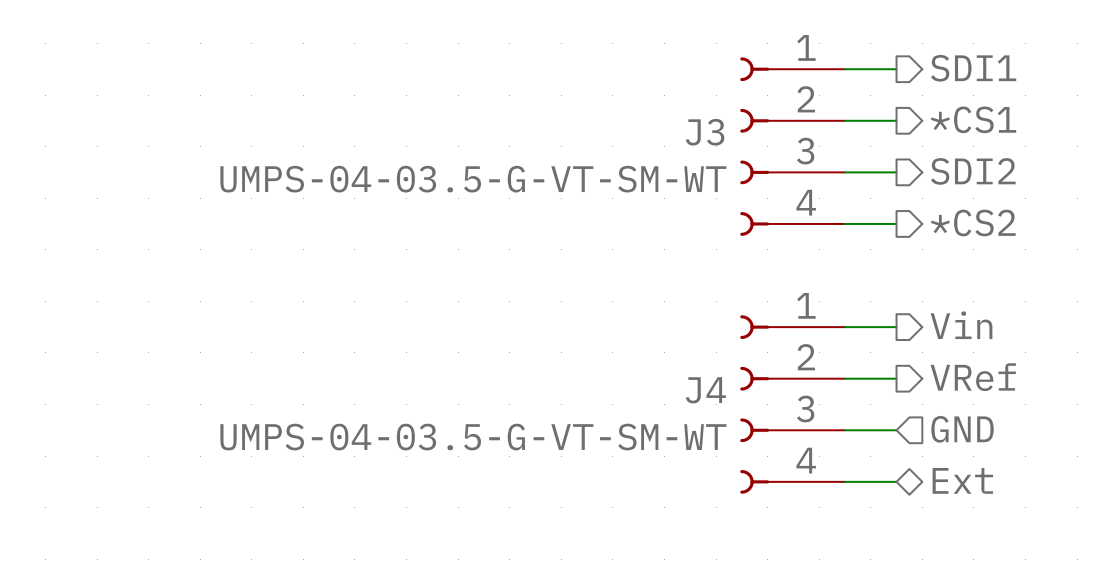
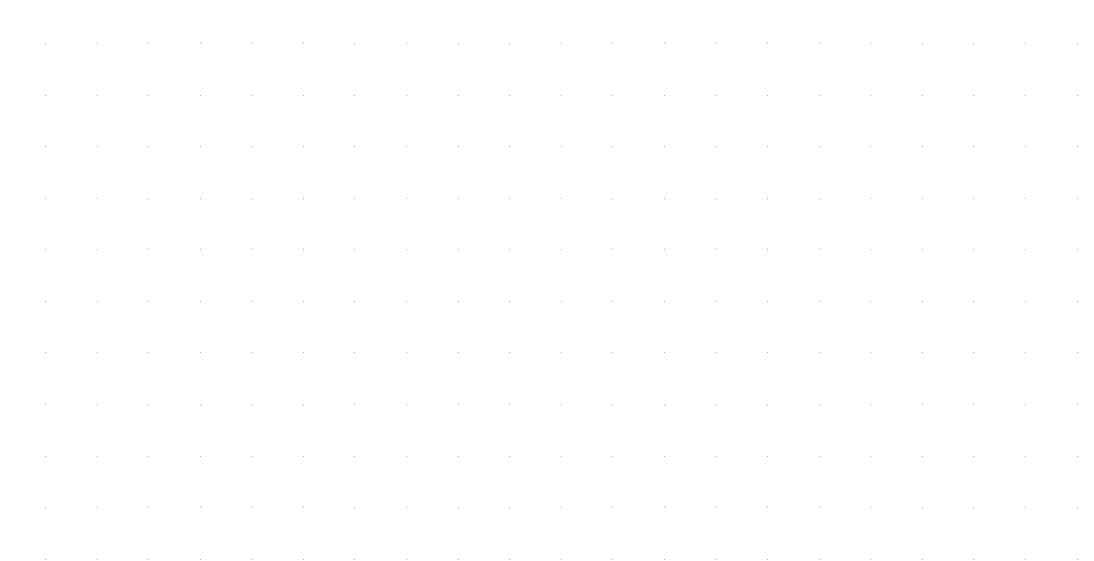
hierarchical label: SDI1 (973, 68) -> none
wire: (844, 69) (896, 69) -> none
hierarchical label: *CS1 (973, 119) -> none
wire: (844, 120) (896, 120) -> none
J3: UMPS-04-03.5-G-VT-SM-WT (792, 146) -> none
hierarchical label: SDI2 (973, 171) -> none
wire: (844, 172) (896, 172) -> none
wire: (844, 223) (896, 223) -> none
hierarchical label: *CS2 (973, 223) -> none
hierarchical label: Vin (961, 325) -> none
wire: (844, 327) (896, 327) -> none
hierarchical label: VRef (973, 377) -> none
wire: (844, 378) (896, 378) -> none
J4: UMPS-04-03.5-G-VT-SM-WT (792, 404) -> none
hierarchical label: GND (962, 429) -> none
wire: (844, 430) (896, 430) -> none
hierarchical label: Ext (962, 480) -> none
wire: (844, 481) (896, 481) -> none

